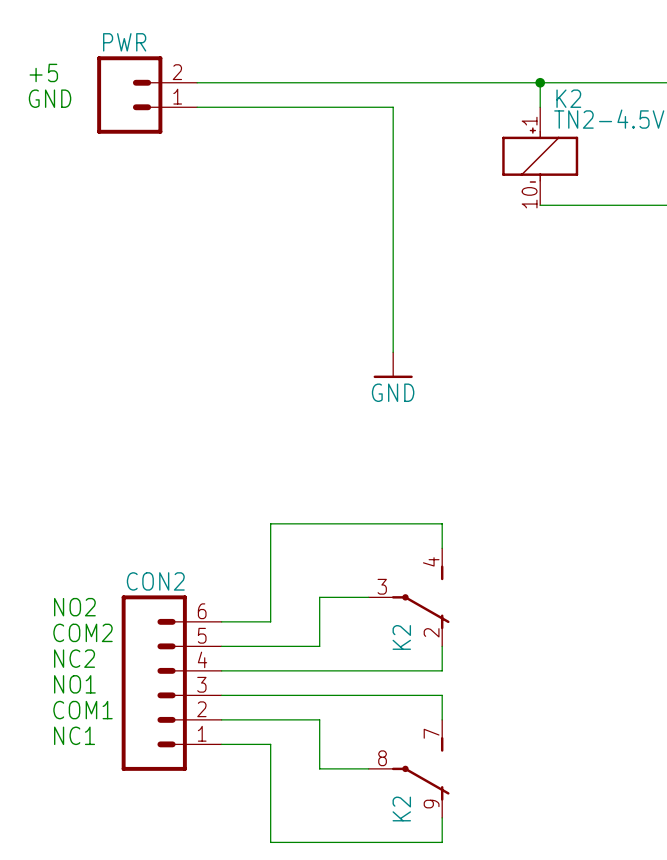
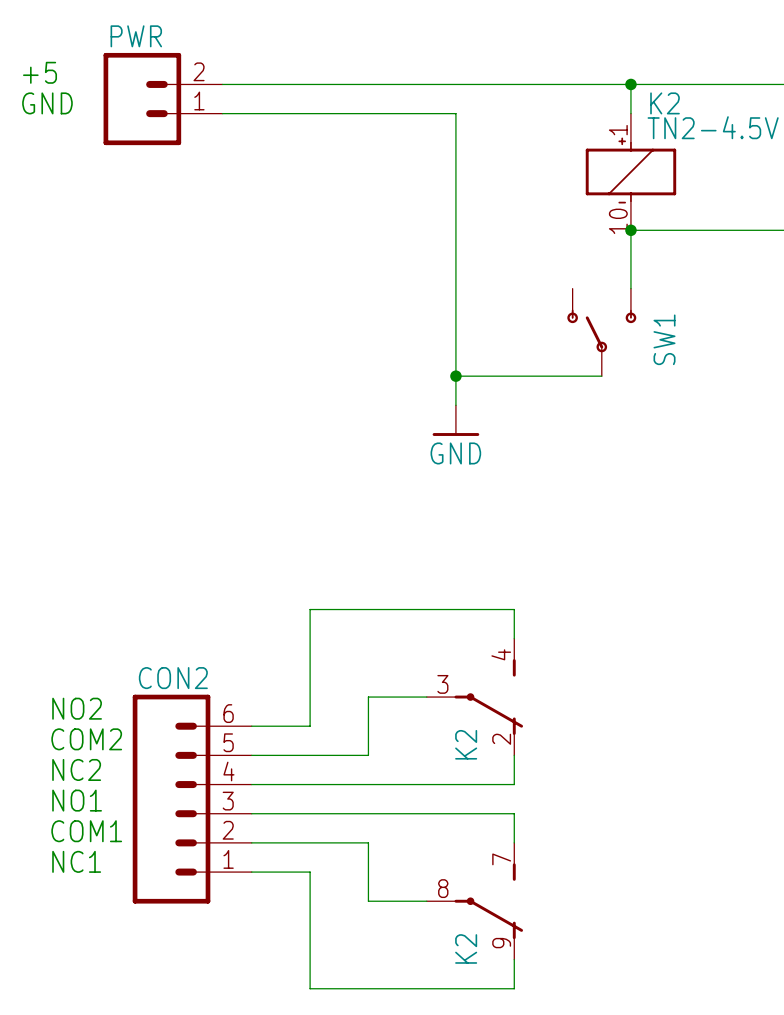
wire: none -> (630, 230) (630, 288)
junction: none -> (630, 230)
SW1: none -> (601, 332)
wire: none -> (455, 376) (601, 376)
junction: none -> (455, 376)

